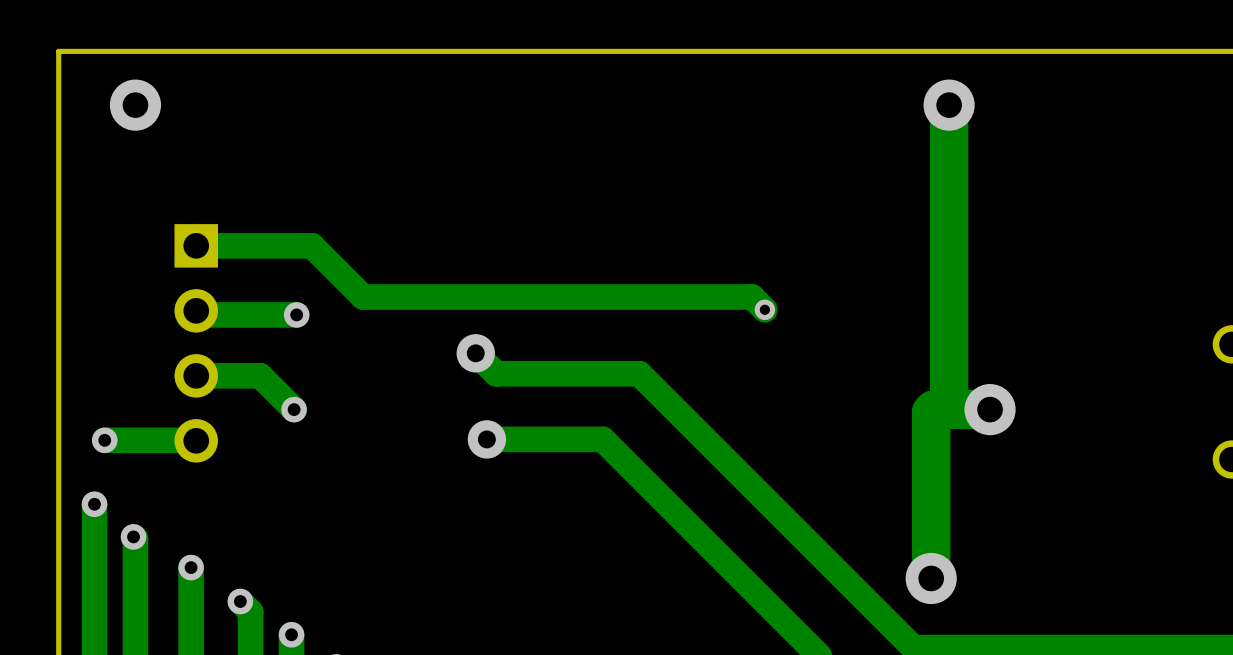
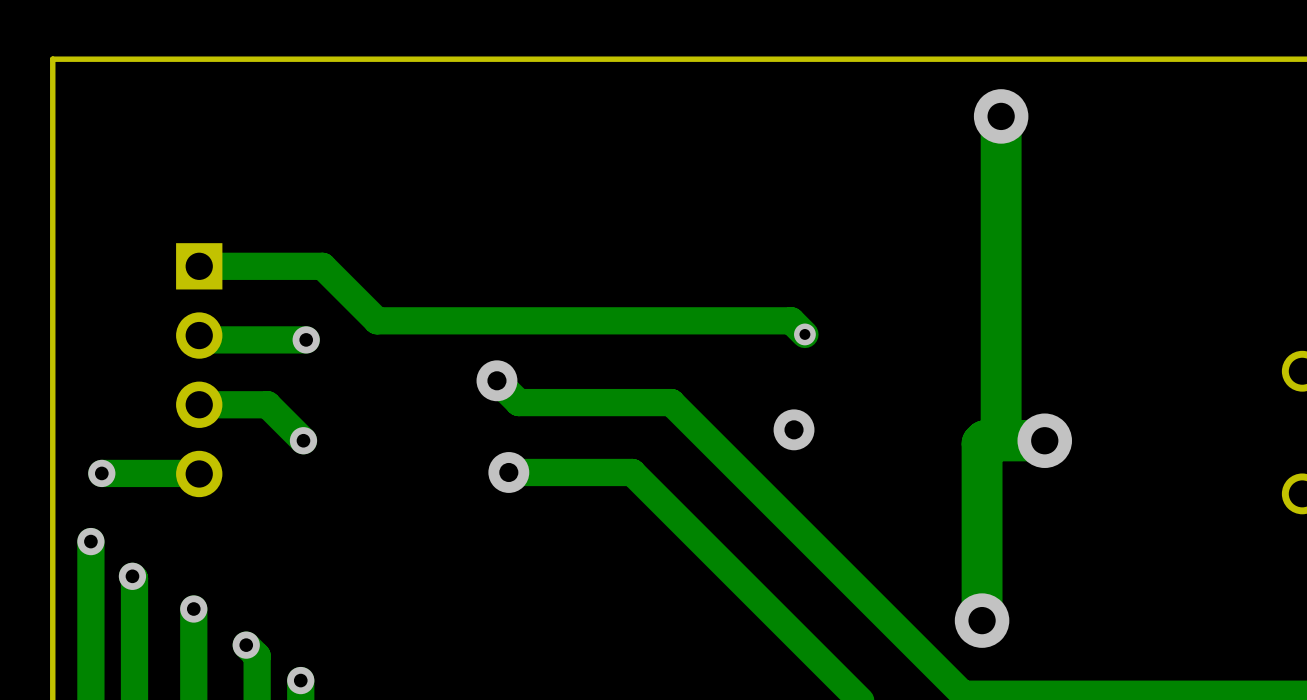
via: (135, 105) -> none
via: none -> (794, 429)

